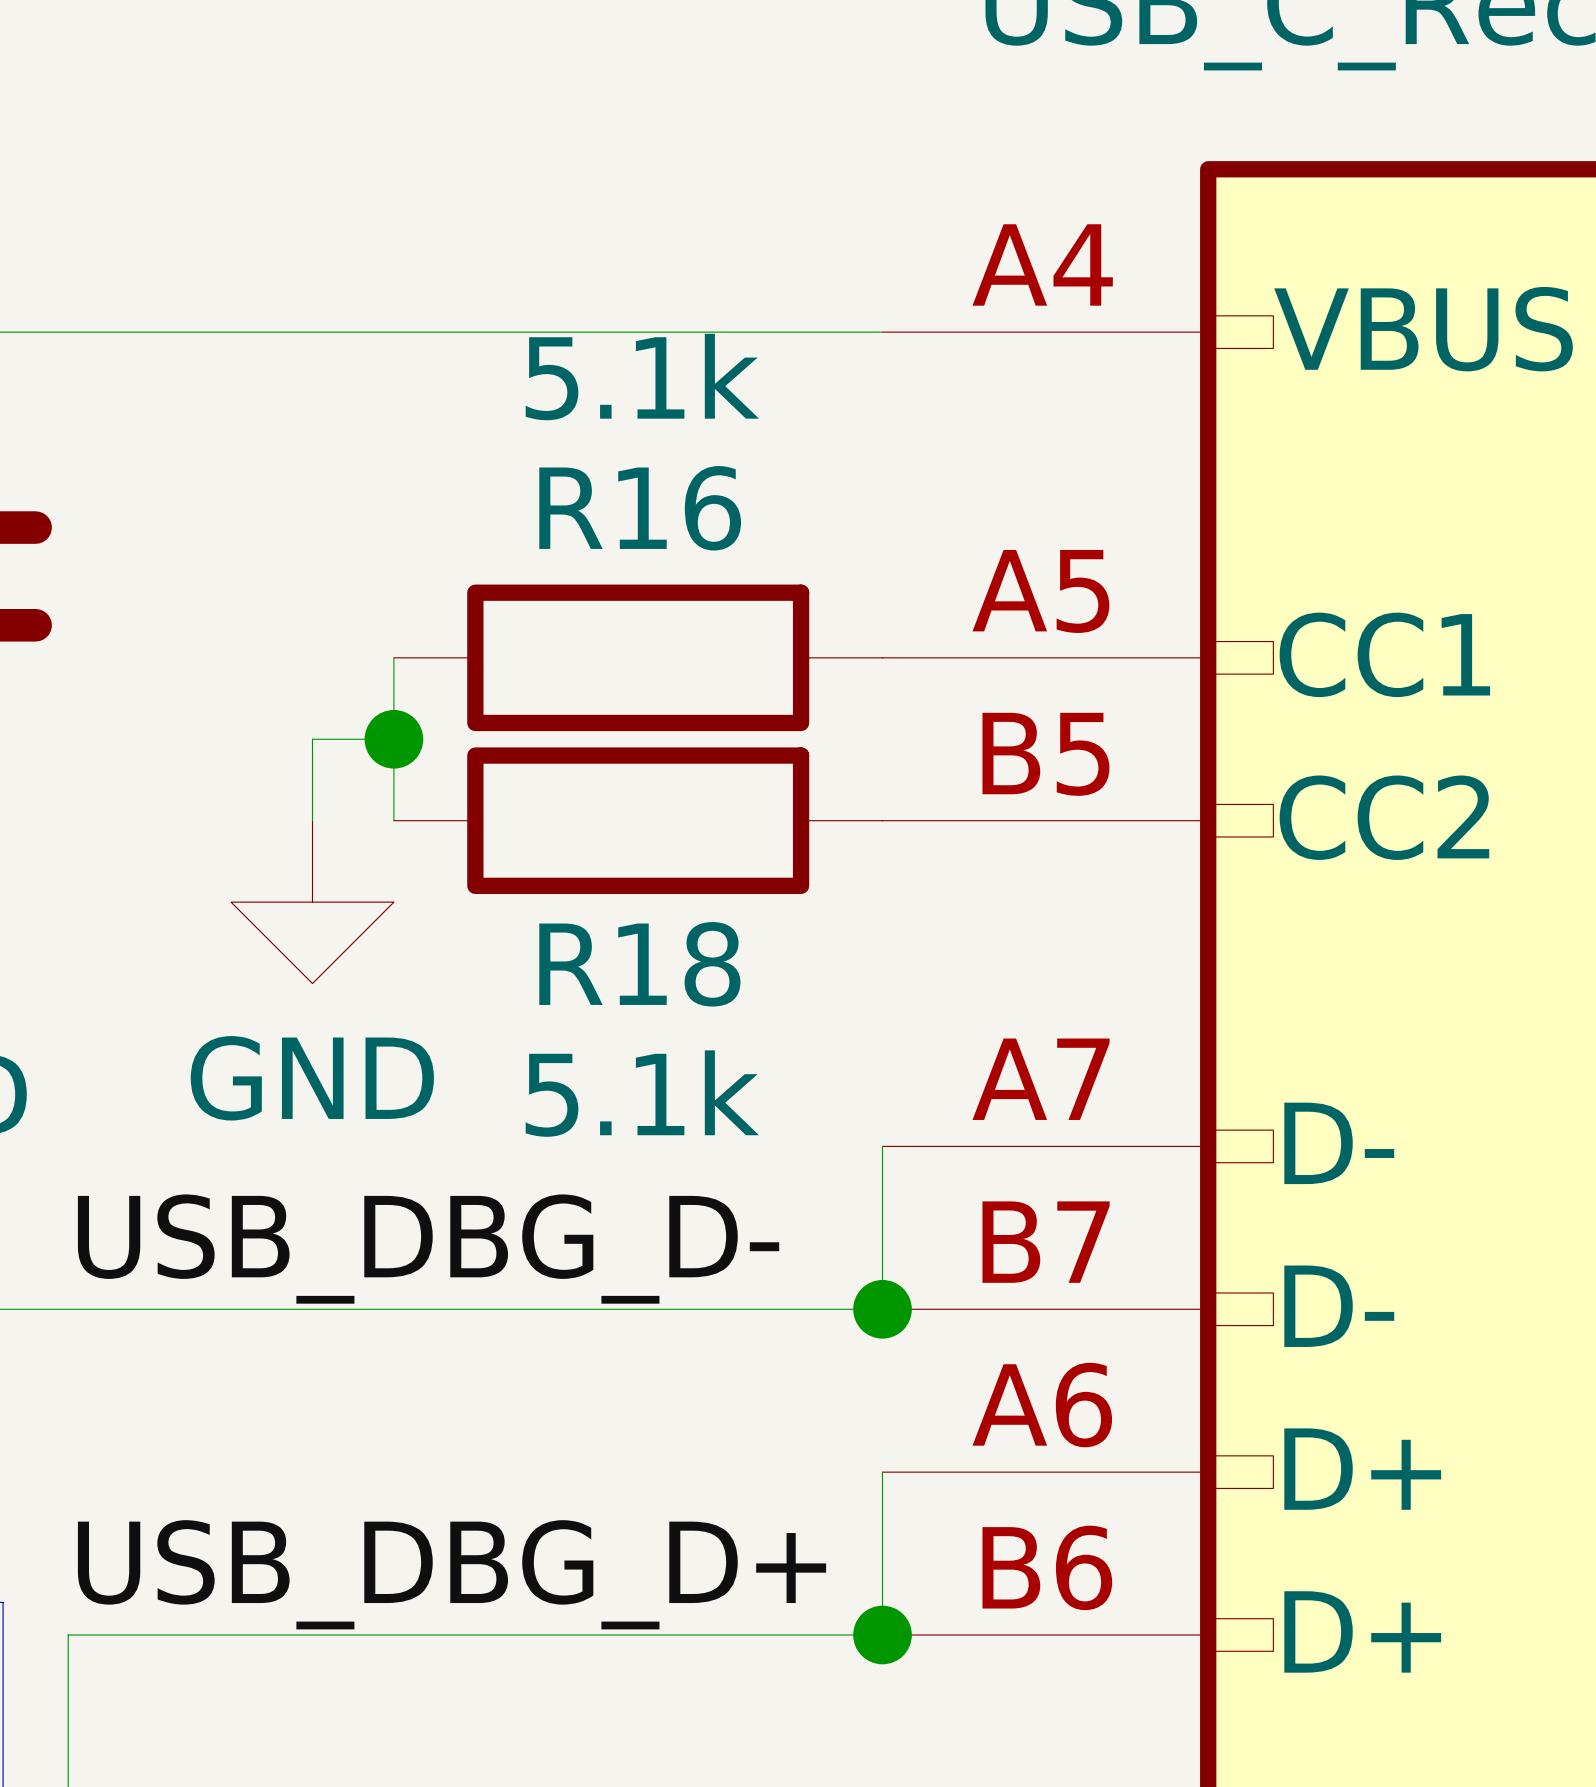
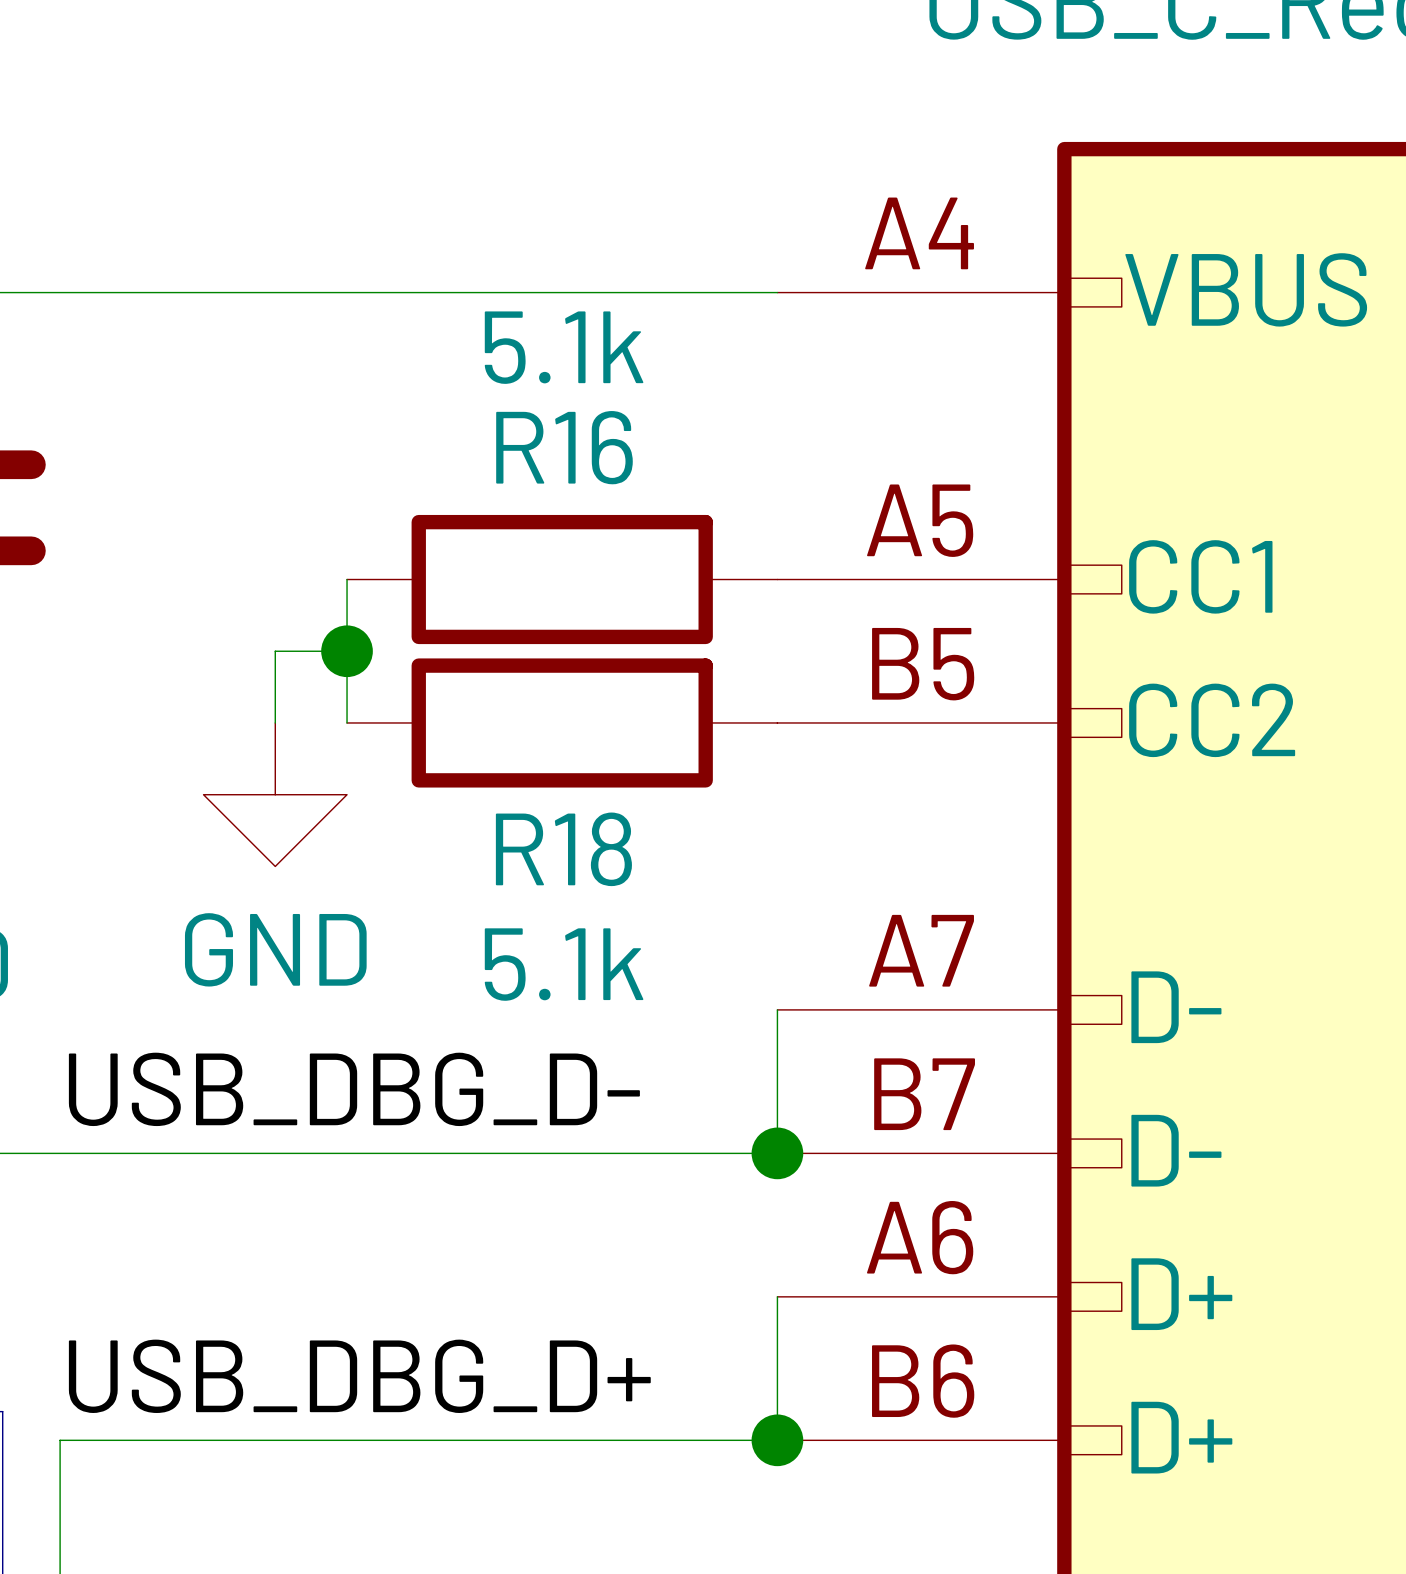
R16 value position: 5.1k (642, 377) -> 5.1k (564, 347)

